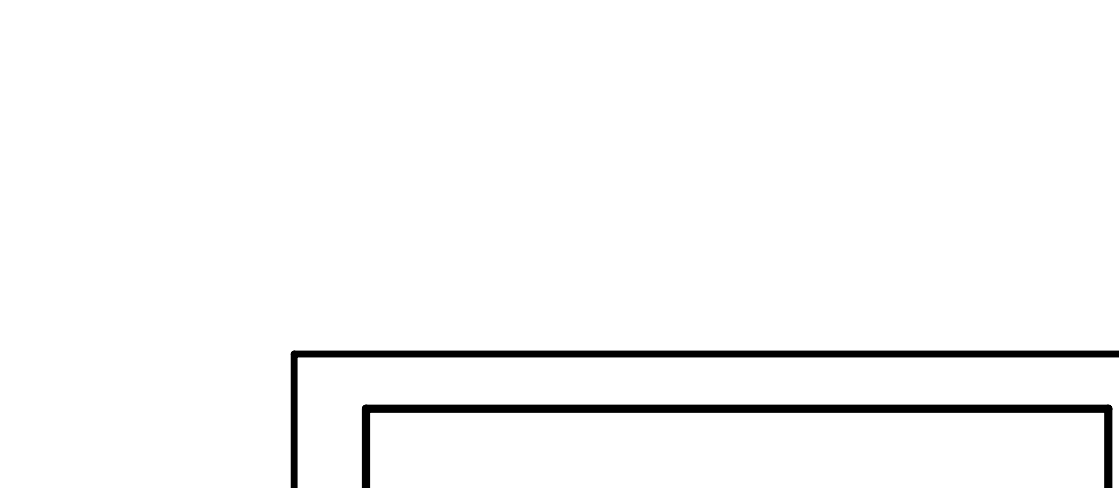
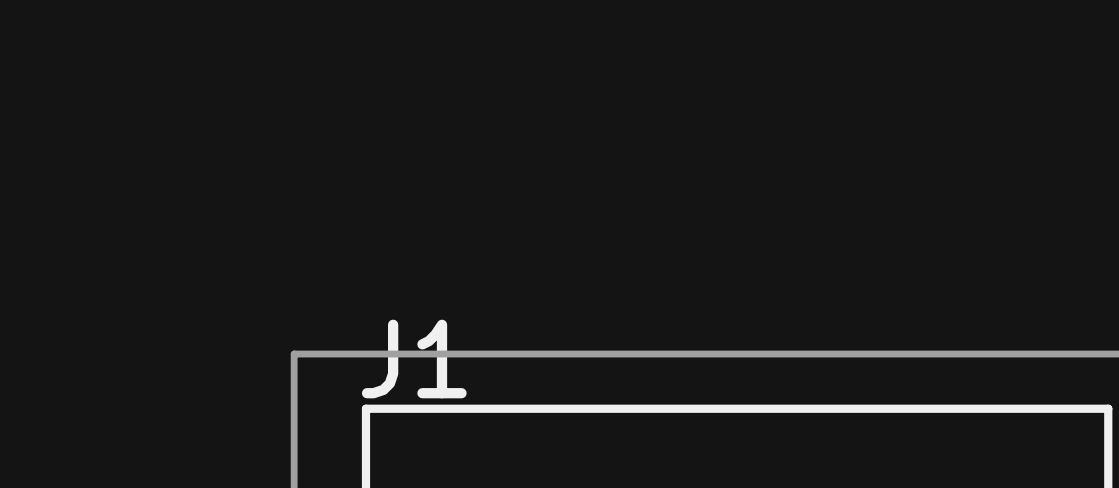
J1 name: none -> J1 (414, 358)

